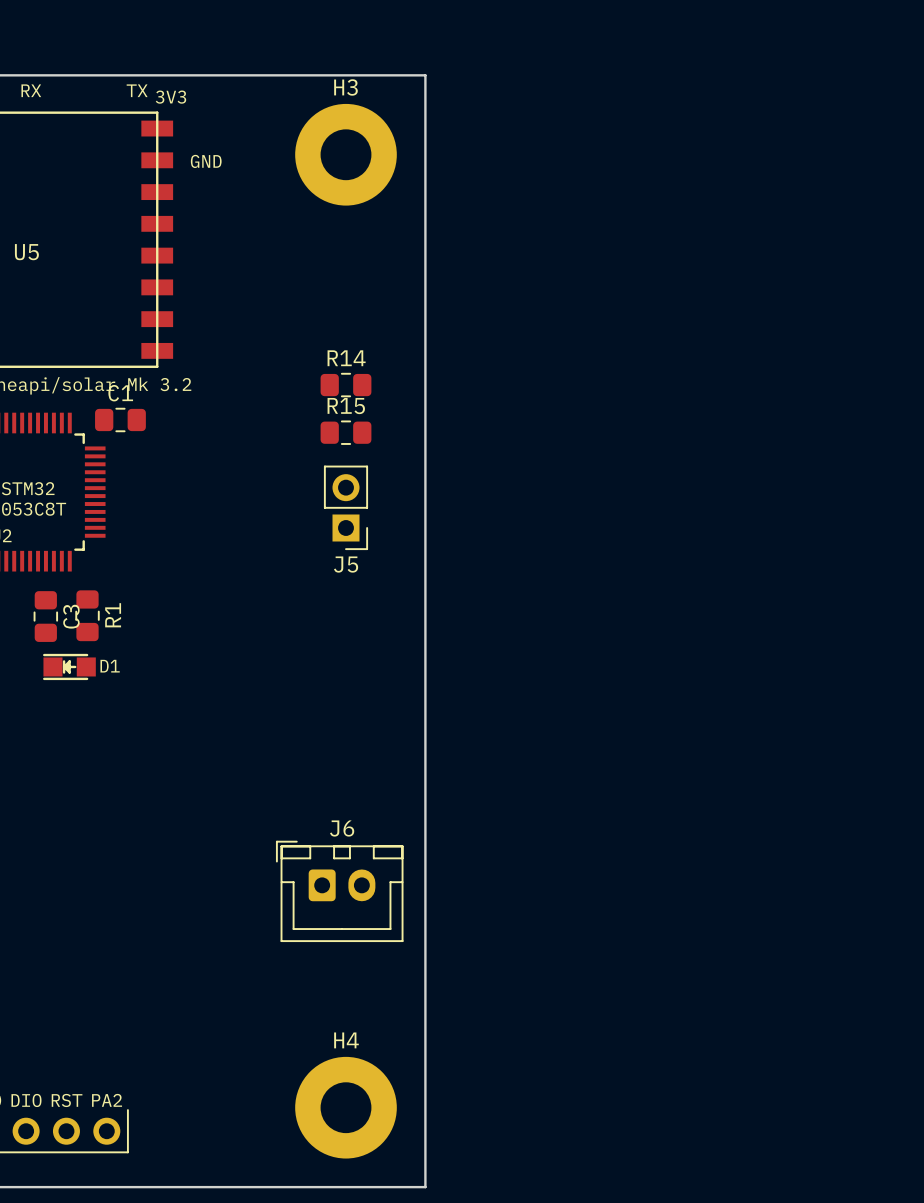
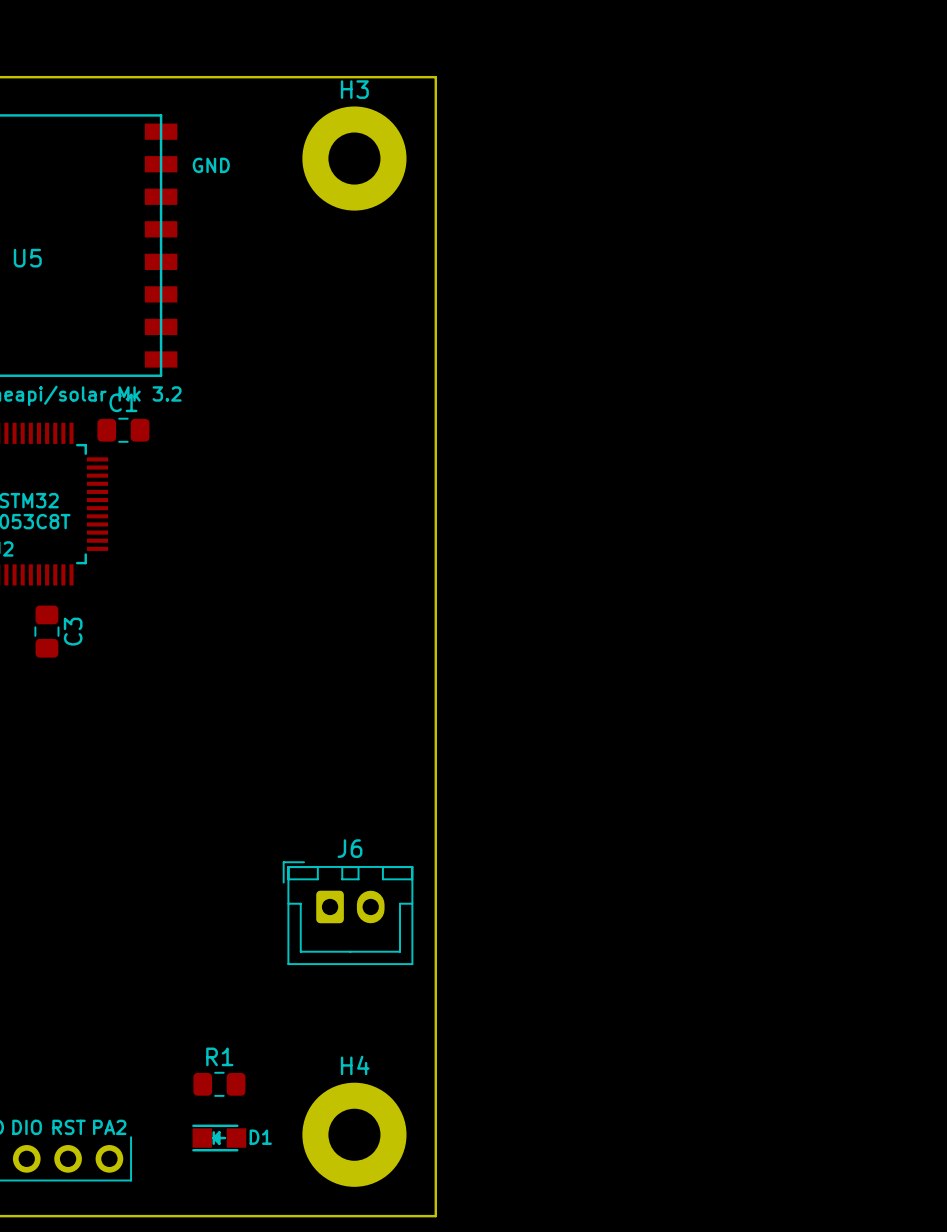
text: RX (31, 90) -> none
text: TX (137, 90) -> none
text: 3V3 (170, 97) -> none
R14: (345, 385) -> none
R15: (345, 432) -> none
J5: (345, 507) -> none
R1 rotation: 0° (87, 615) -> 90° clockwise (219, 1084)
R1 position: (87, 615) -> (219, 1084)
R1 name position: R1 (113, 615) -> R1 (219, 1056)
D1 position: (69, 666) -> (219, 1138)

